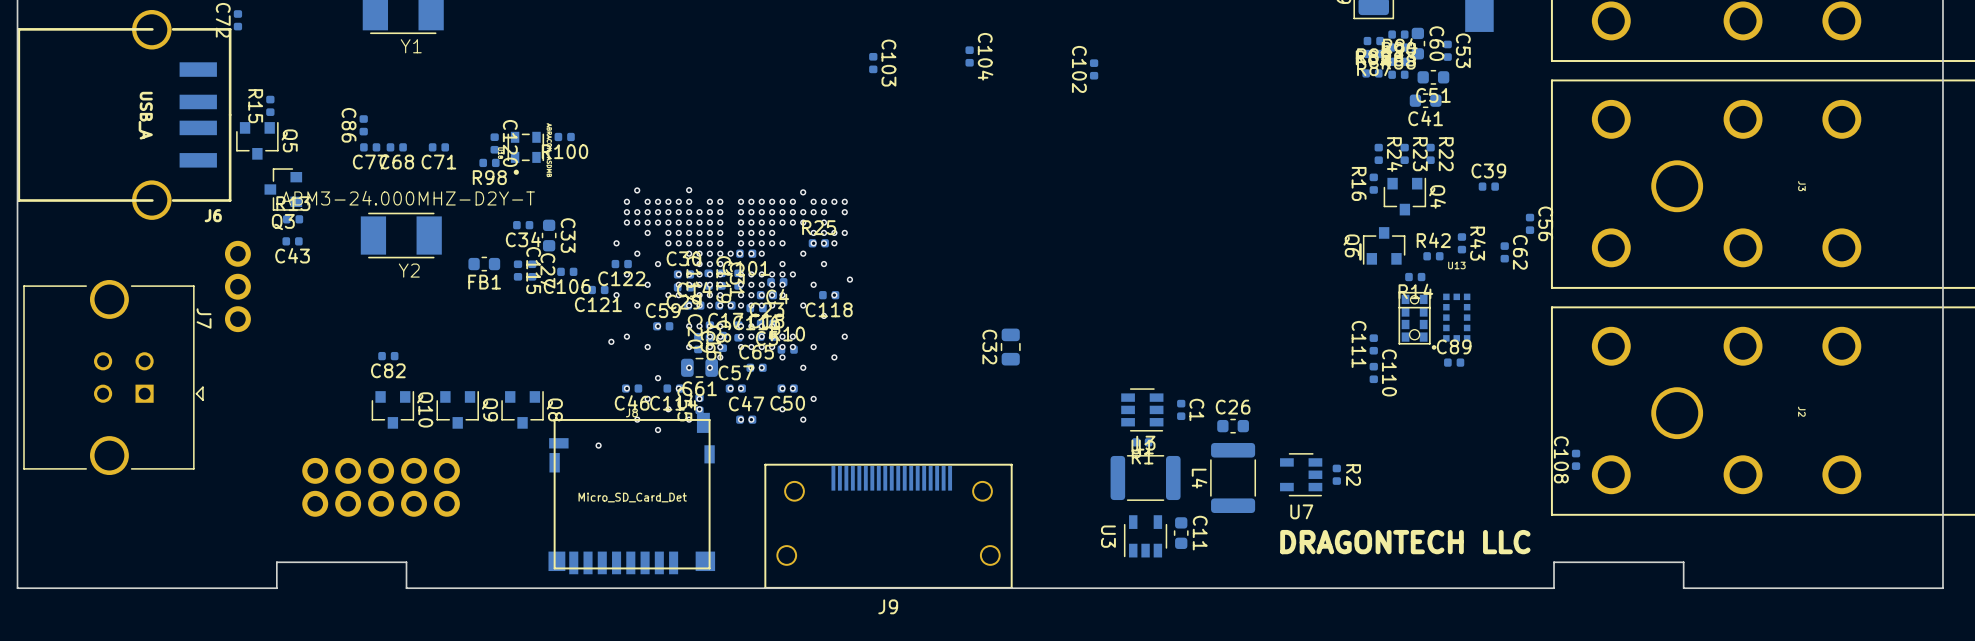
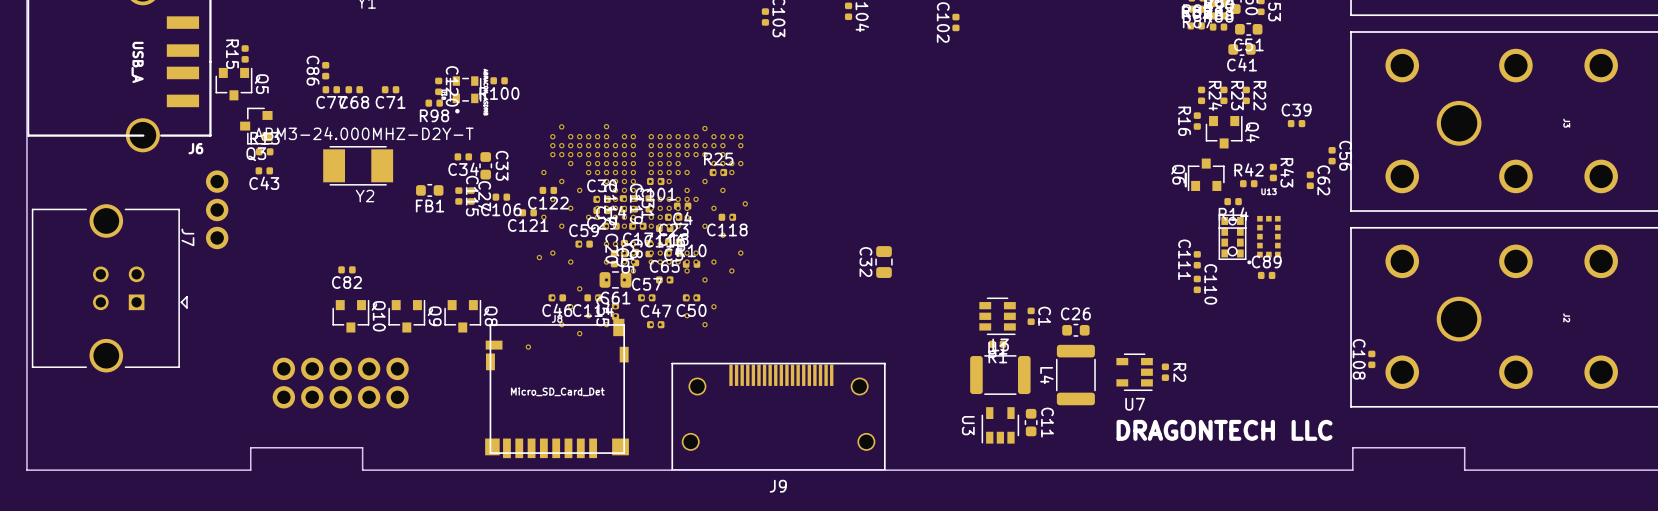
via: (730, 253) -> none

